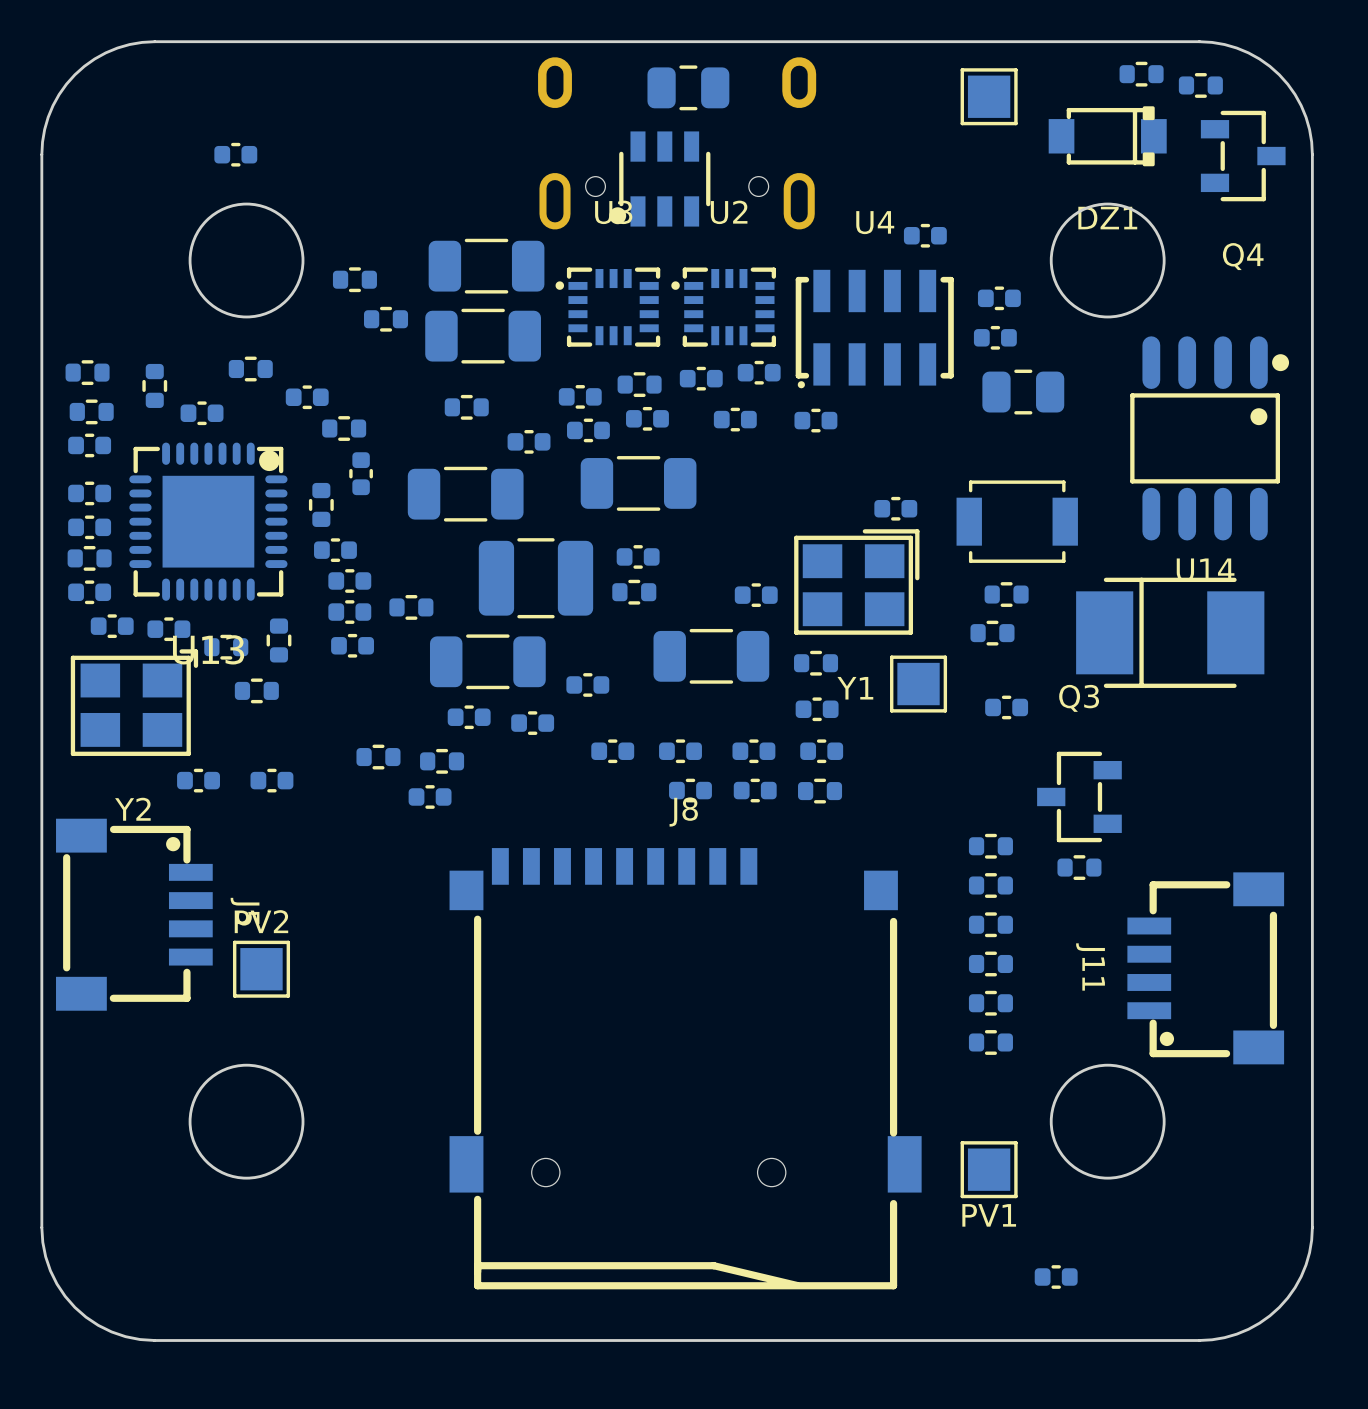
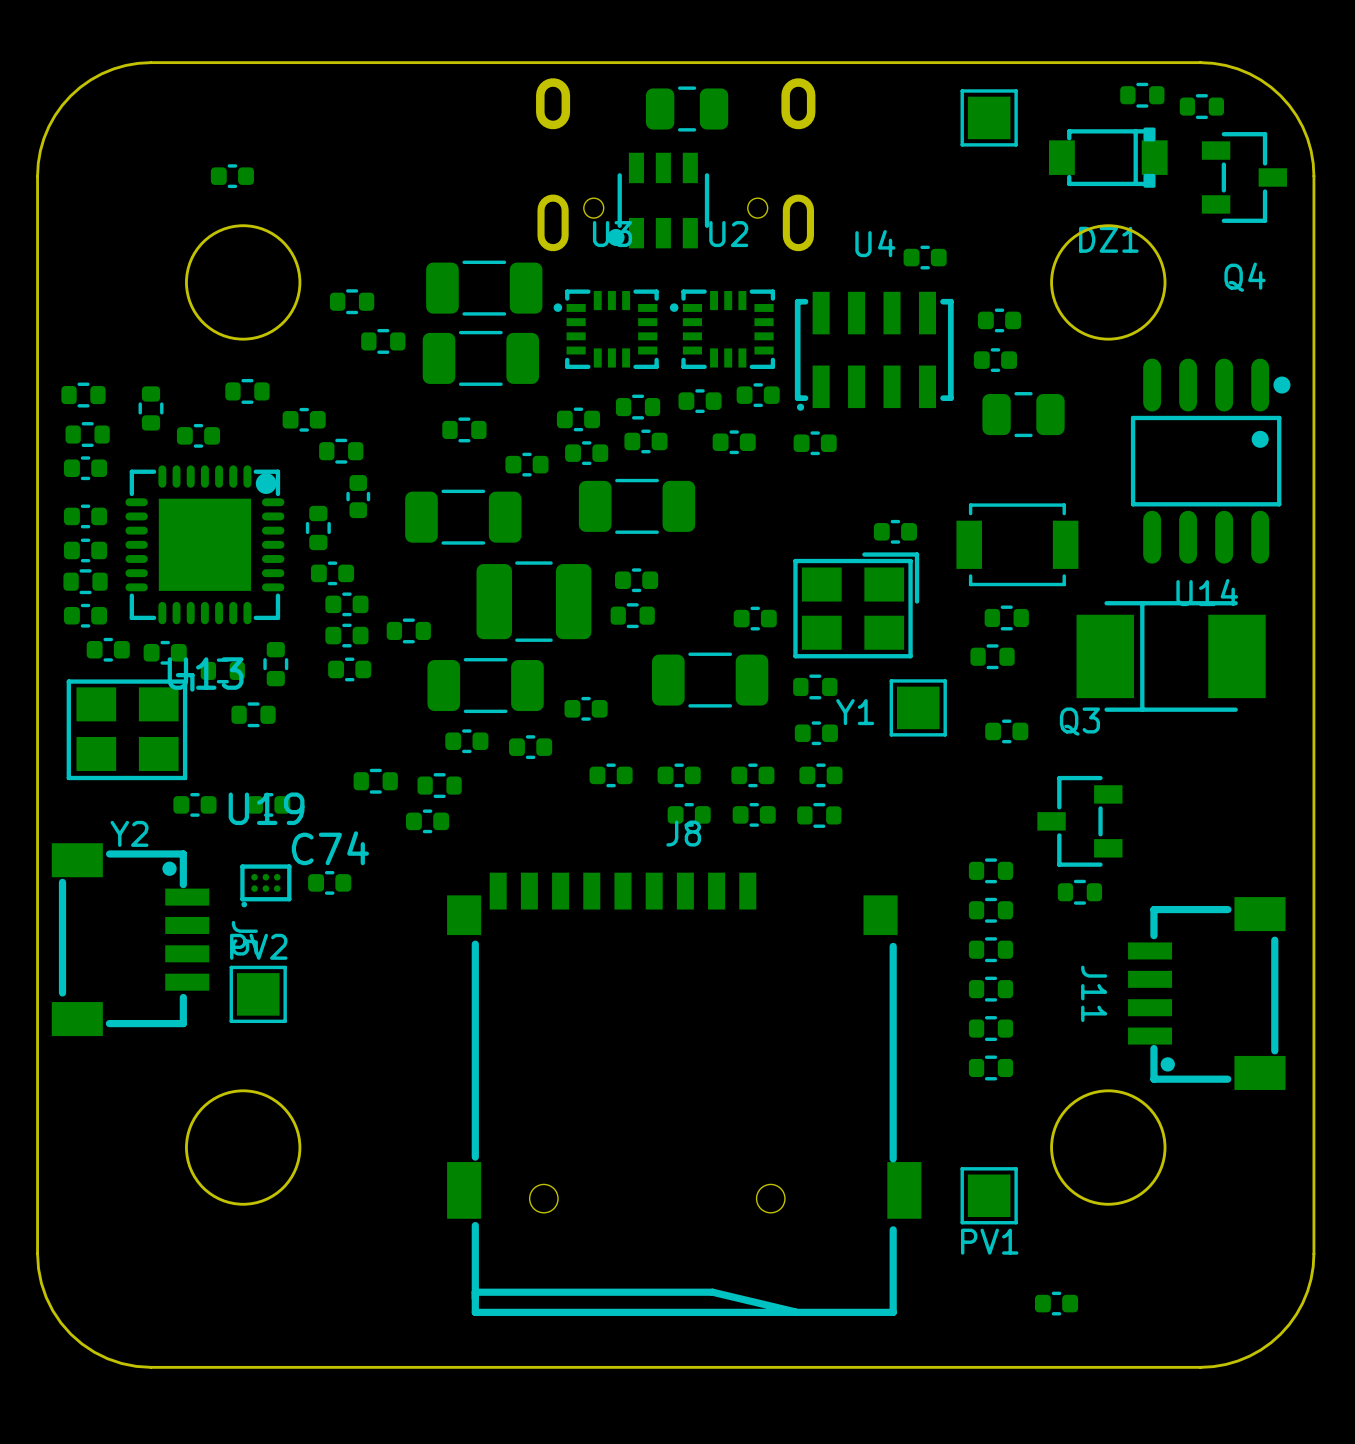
C74: none -> (329, 882)
U19: none -> (265, 885)

